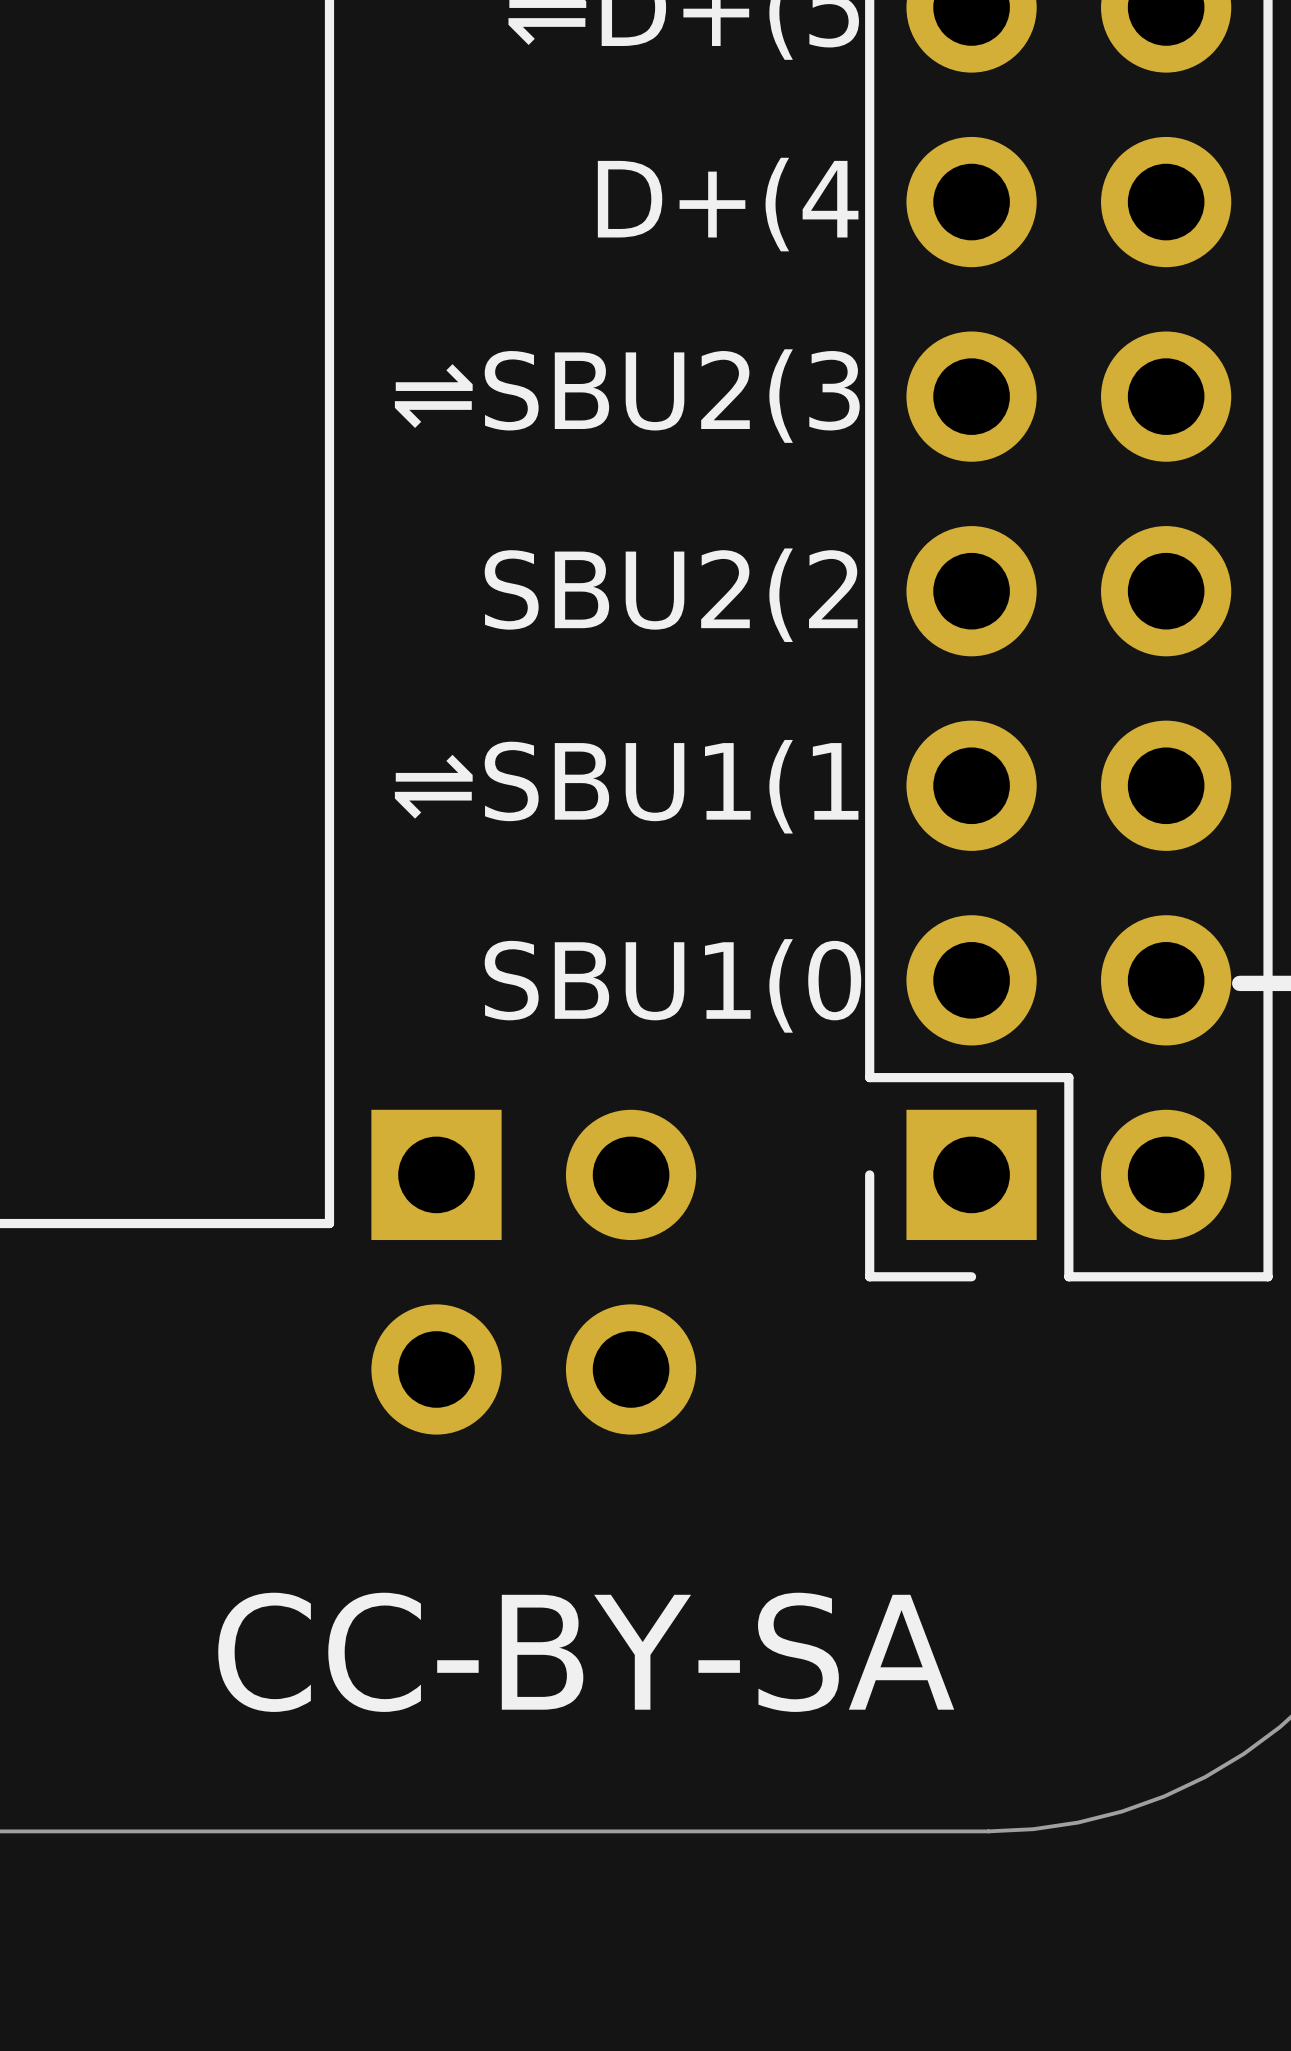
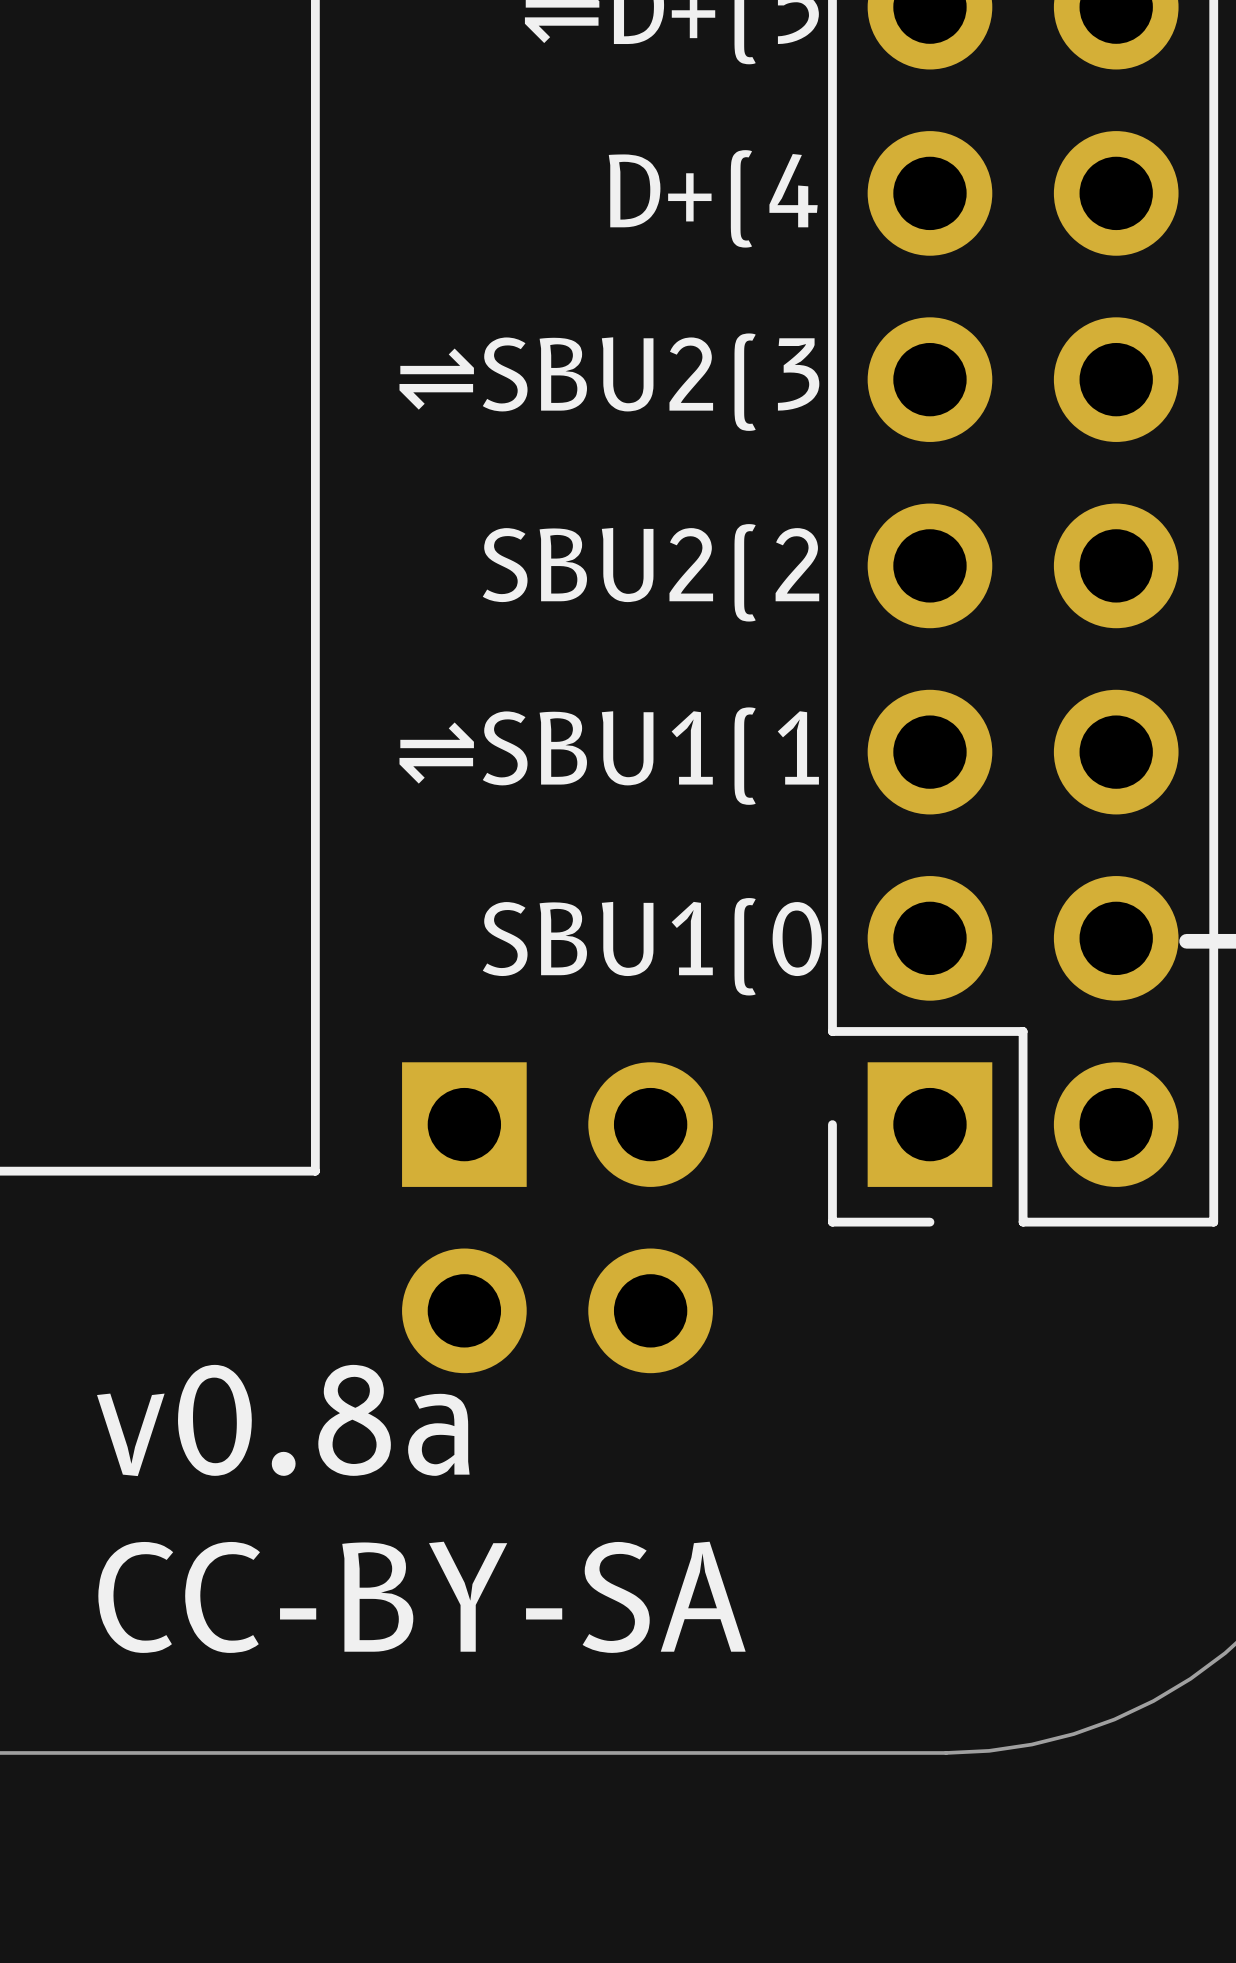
part position: (533, 1272) -> (557, 1217)
text: none -> v0.8a (283, 1420)
text position: CC-BY-SA (586, 1652) -> CC-BY-SA (421, 1597)

